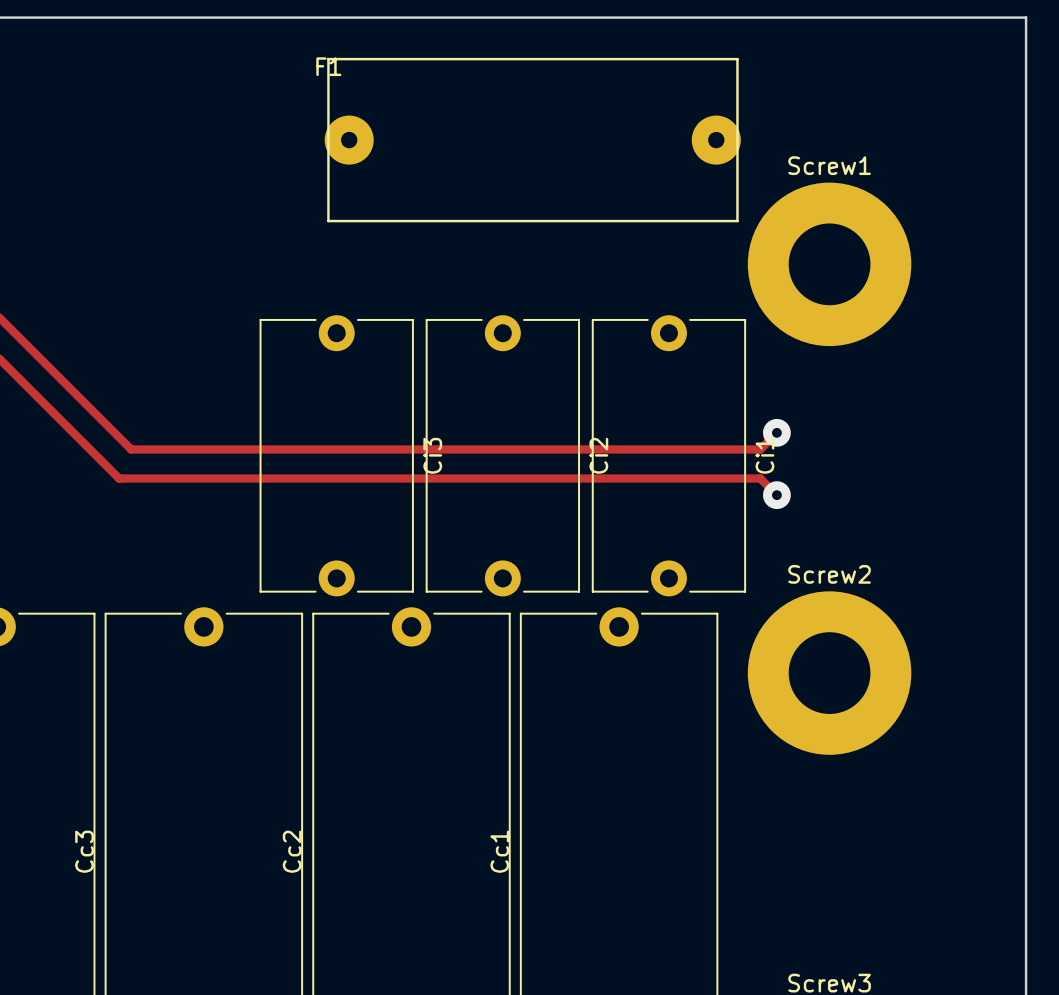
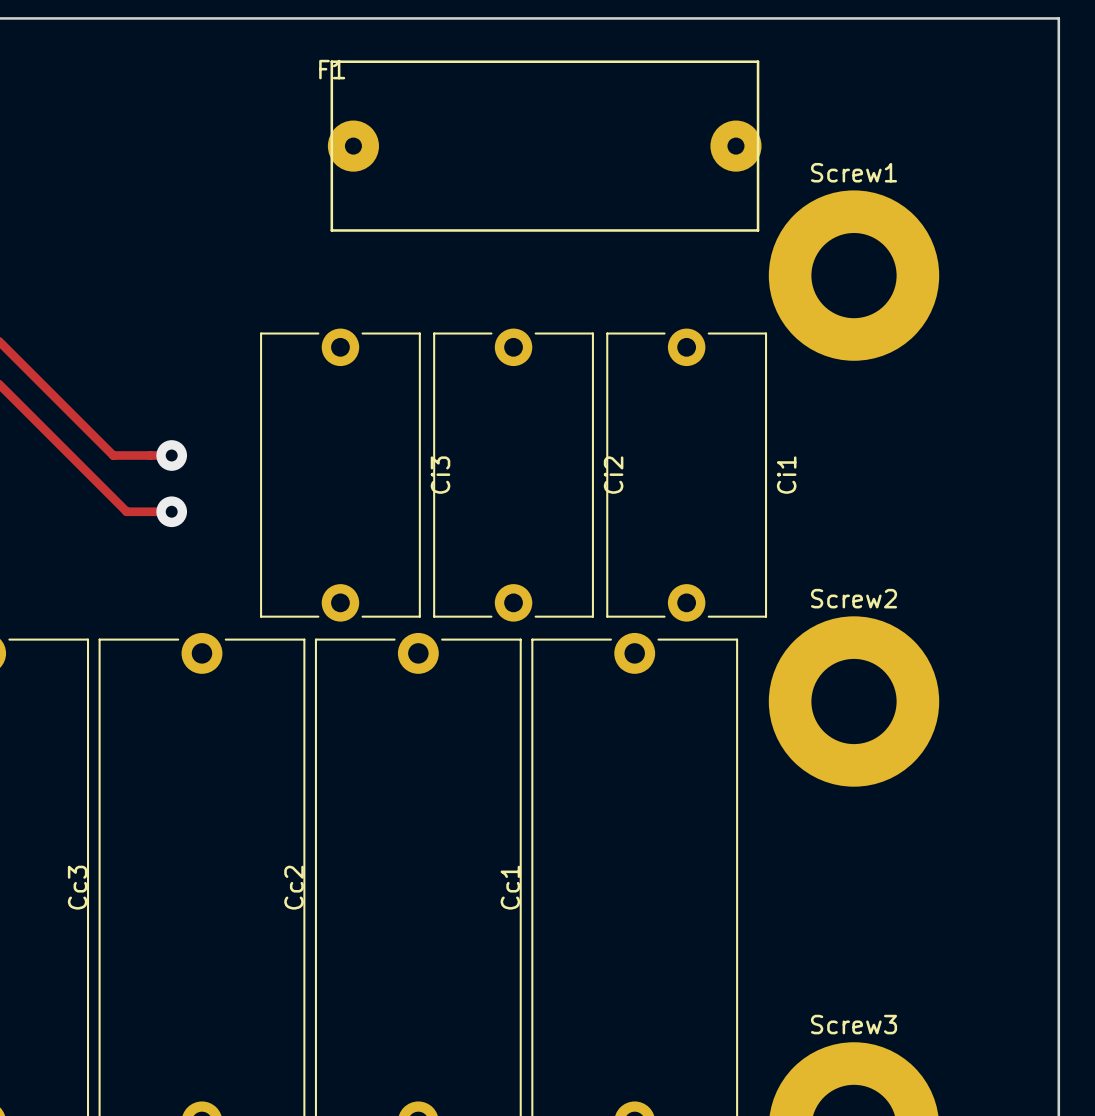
track: (776, 432) (760, 449) (131, 449) (118, 437) -> (171, 455) (113, 455)
via: (776, 432) -> none
via: none -> (171, 455)
track: (119, 478) (760, 478) (776, 495) -> (113, 498) (126, 511) (171, 511)
via: none -> (171, 511)
via: (776, 495) -> none

